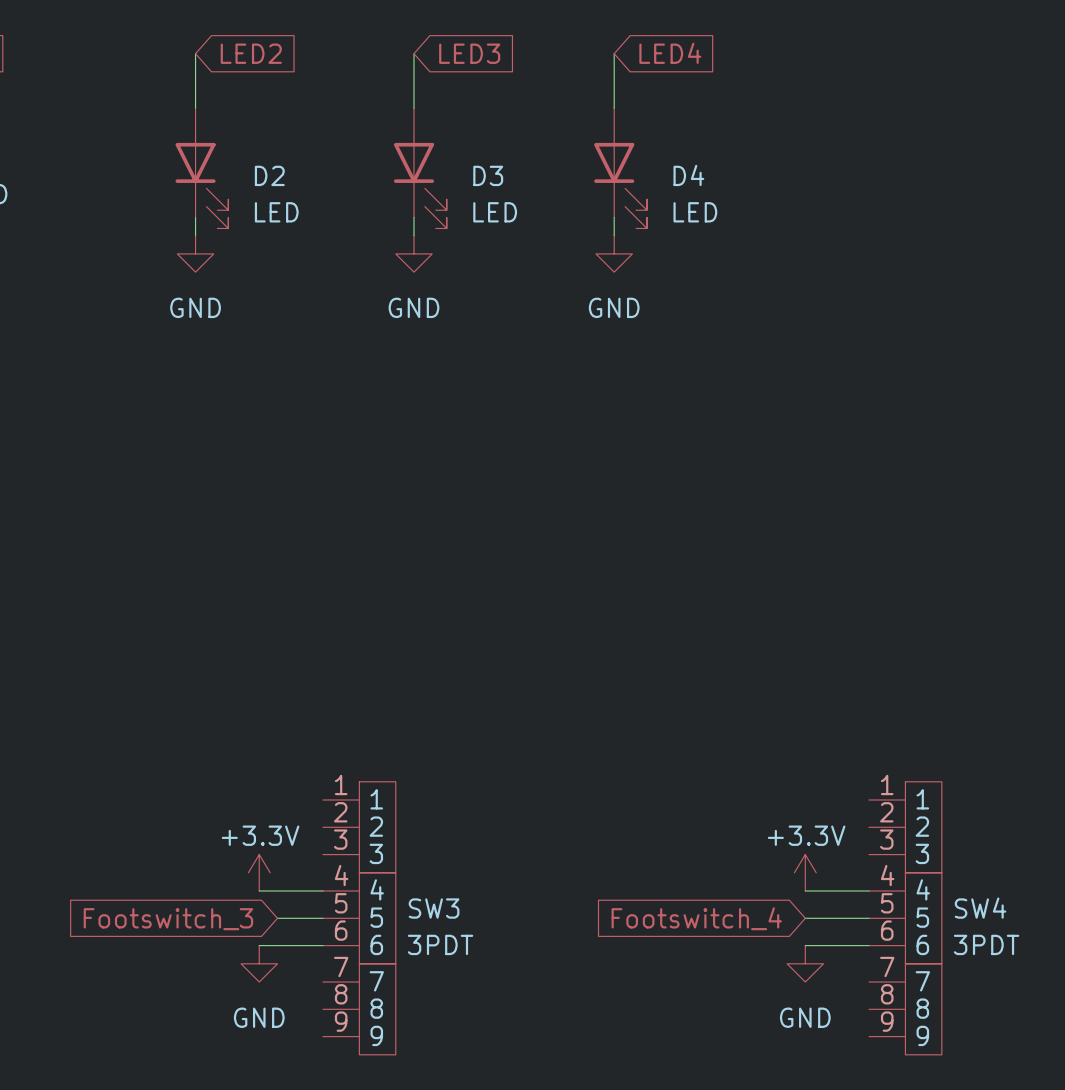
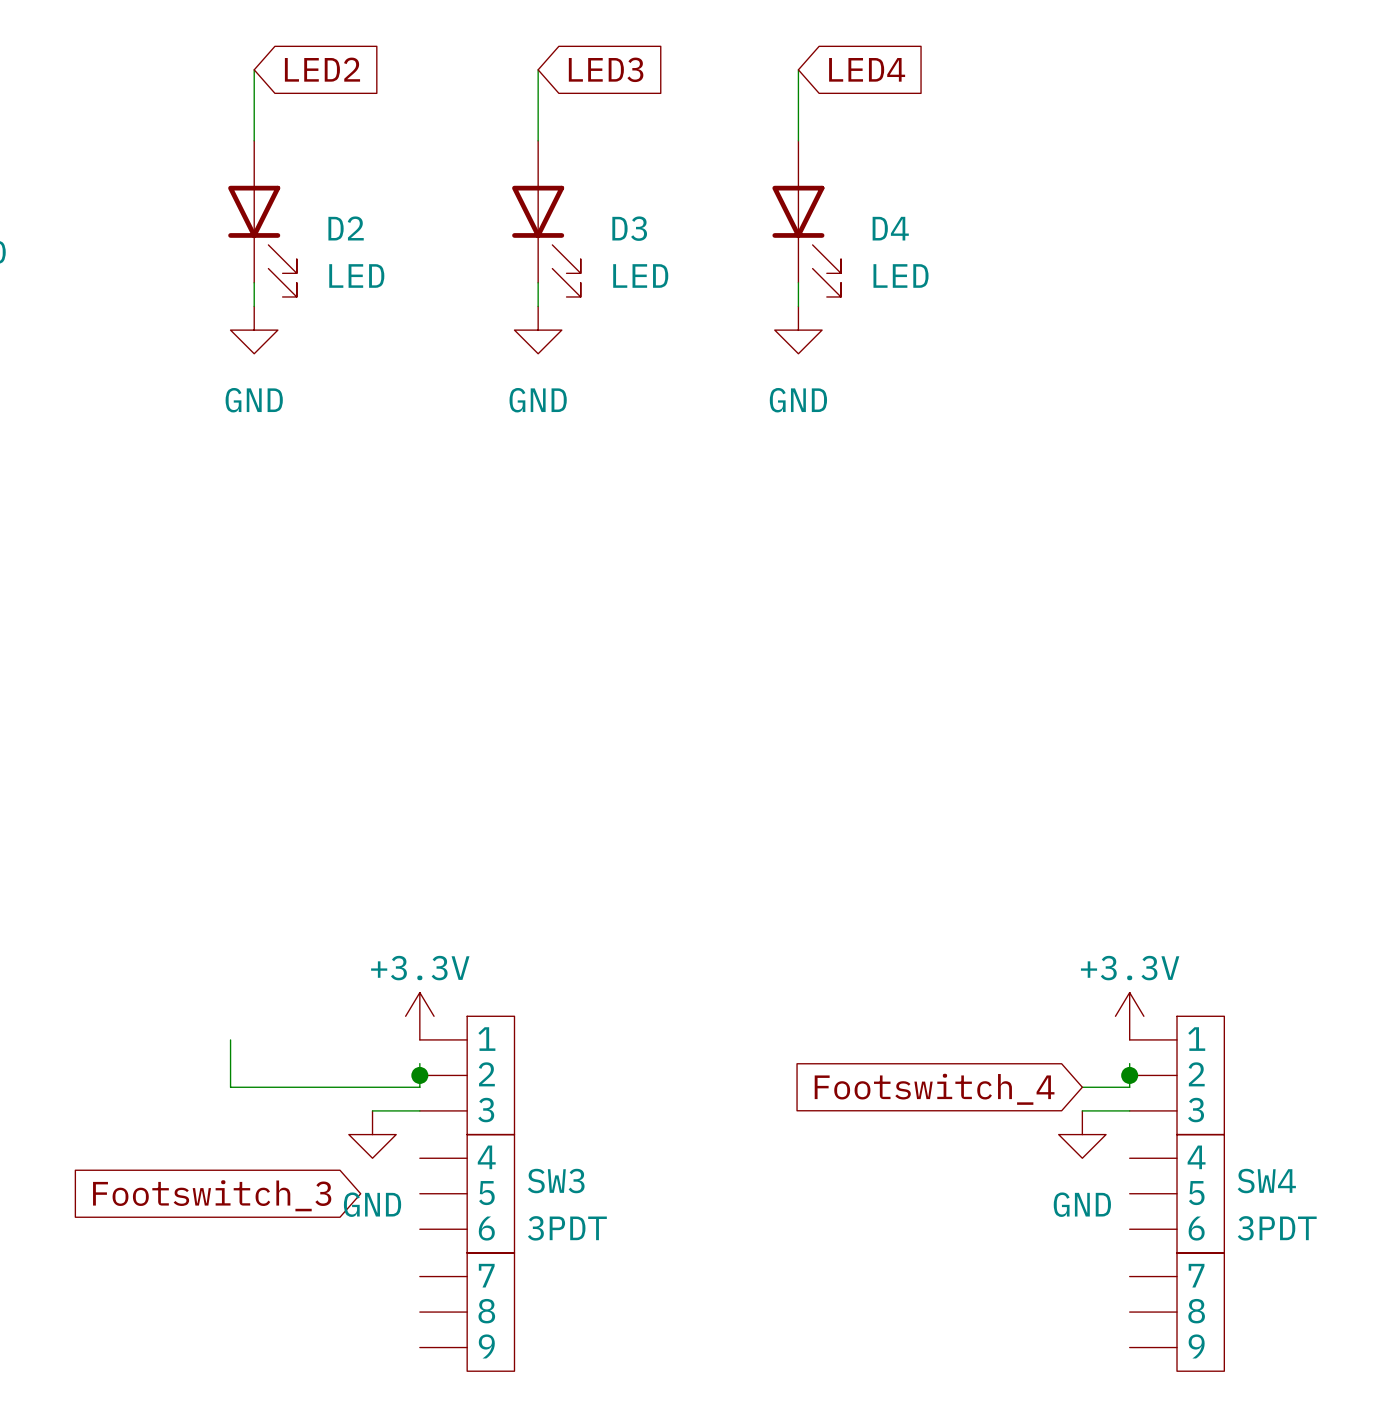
SW3 symbol: [322, 781, 396, 1055] -> [419, 1016, 515, 1372]
SW4 symbol: [869, 781, 942, 1055] -> [1129, 1016, 1225, 1372]
wire: none -> (230, 1039) (230, 1087) (419, 1087) (419, 1063)
wire: none -> (1129, 1063) (1129, 1087) (1082, 1087)
junction: none -> (419, 1075)
junction: none -> (1129, 1075)
wire: none -> (372, 1110) (419, 1110)
wire: none -> (1082, 1110) (1129, 1110)
power symbol position: +3.3V (259, 872) -> +3.3V (419, 1016)
power symbol position: +3.3V (805, 872) -> +3.3V (1129, 1016)
wire: (259, 891) (322, 891) -> none
wire: (805, 891) (869, 891) -> none
wire: (277, 918) (322, 918) -> none
global label position: Footswitch_4 (696, 918) -> Footswitch_4 (934, 1089)
wire: (805, 918) (869, 918) -> none
wire: (259, 945) (322, 945) -> none
wire: (805, 945) (869, 945) -> none
power symbol position: GND (259, 963) -> GND (372, 1134)
power symbol position: GND (805, 963) -> GND (1082, 1134)

